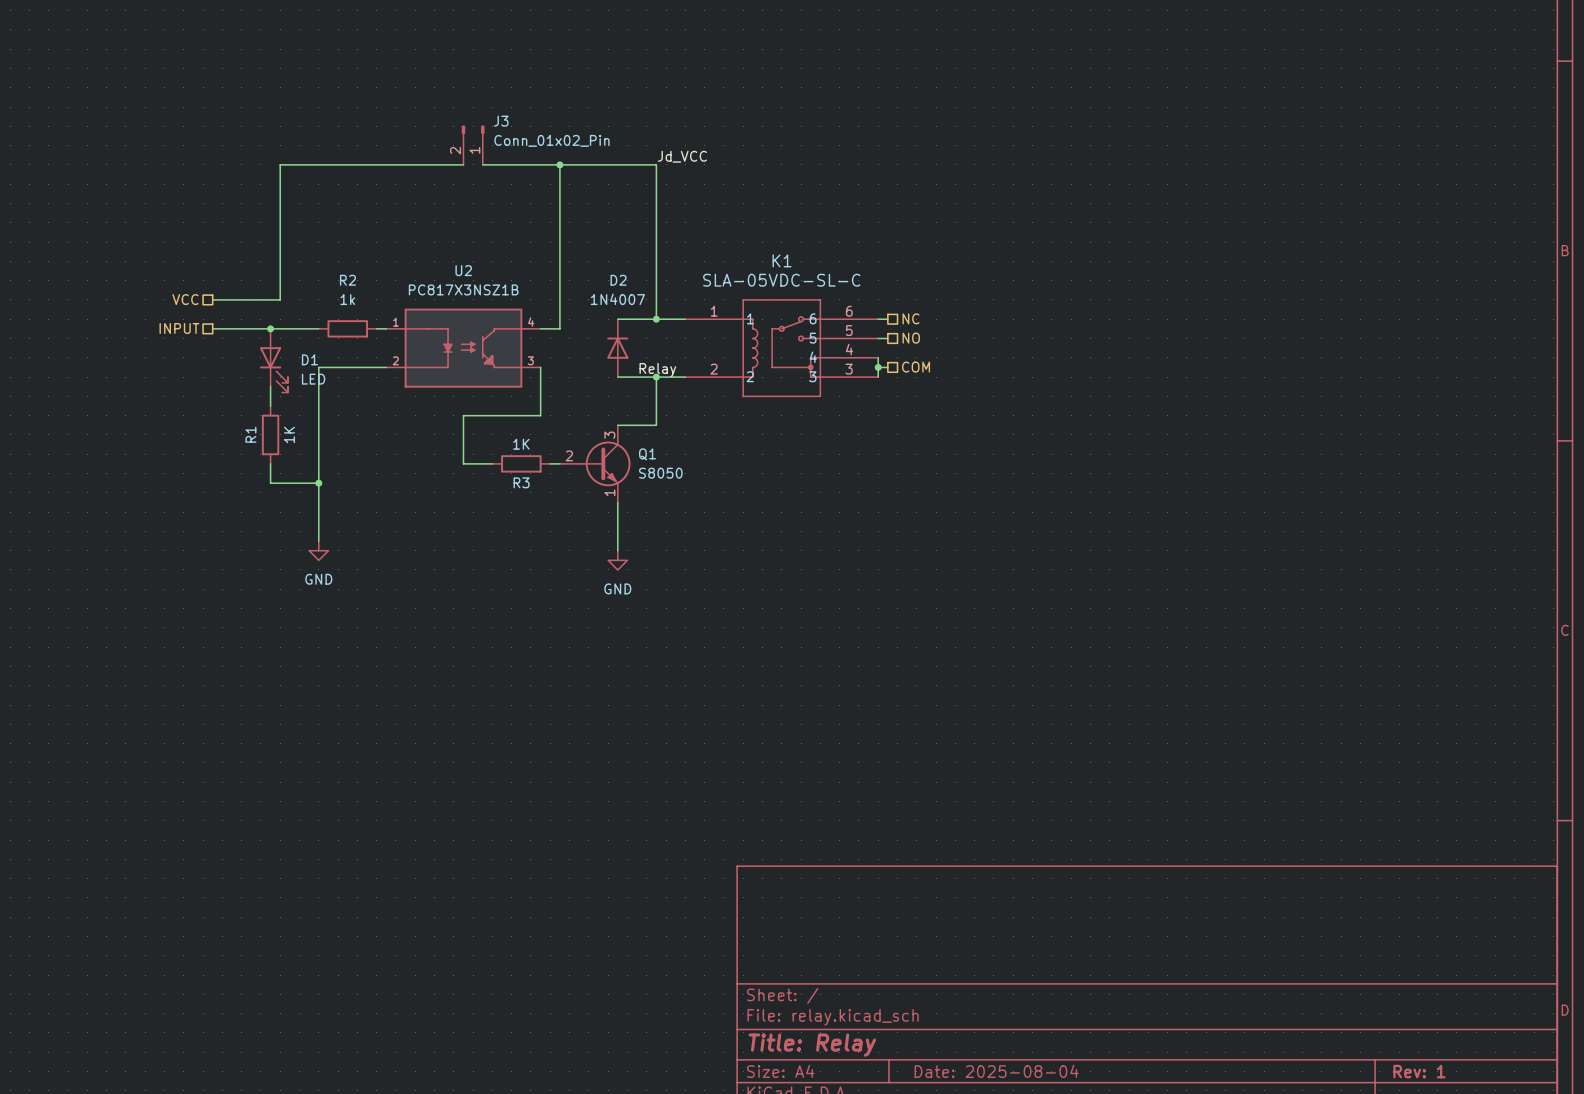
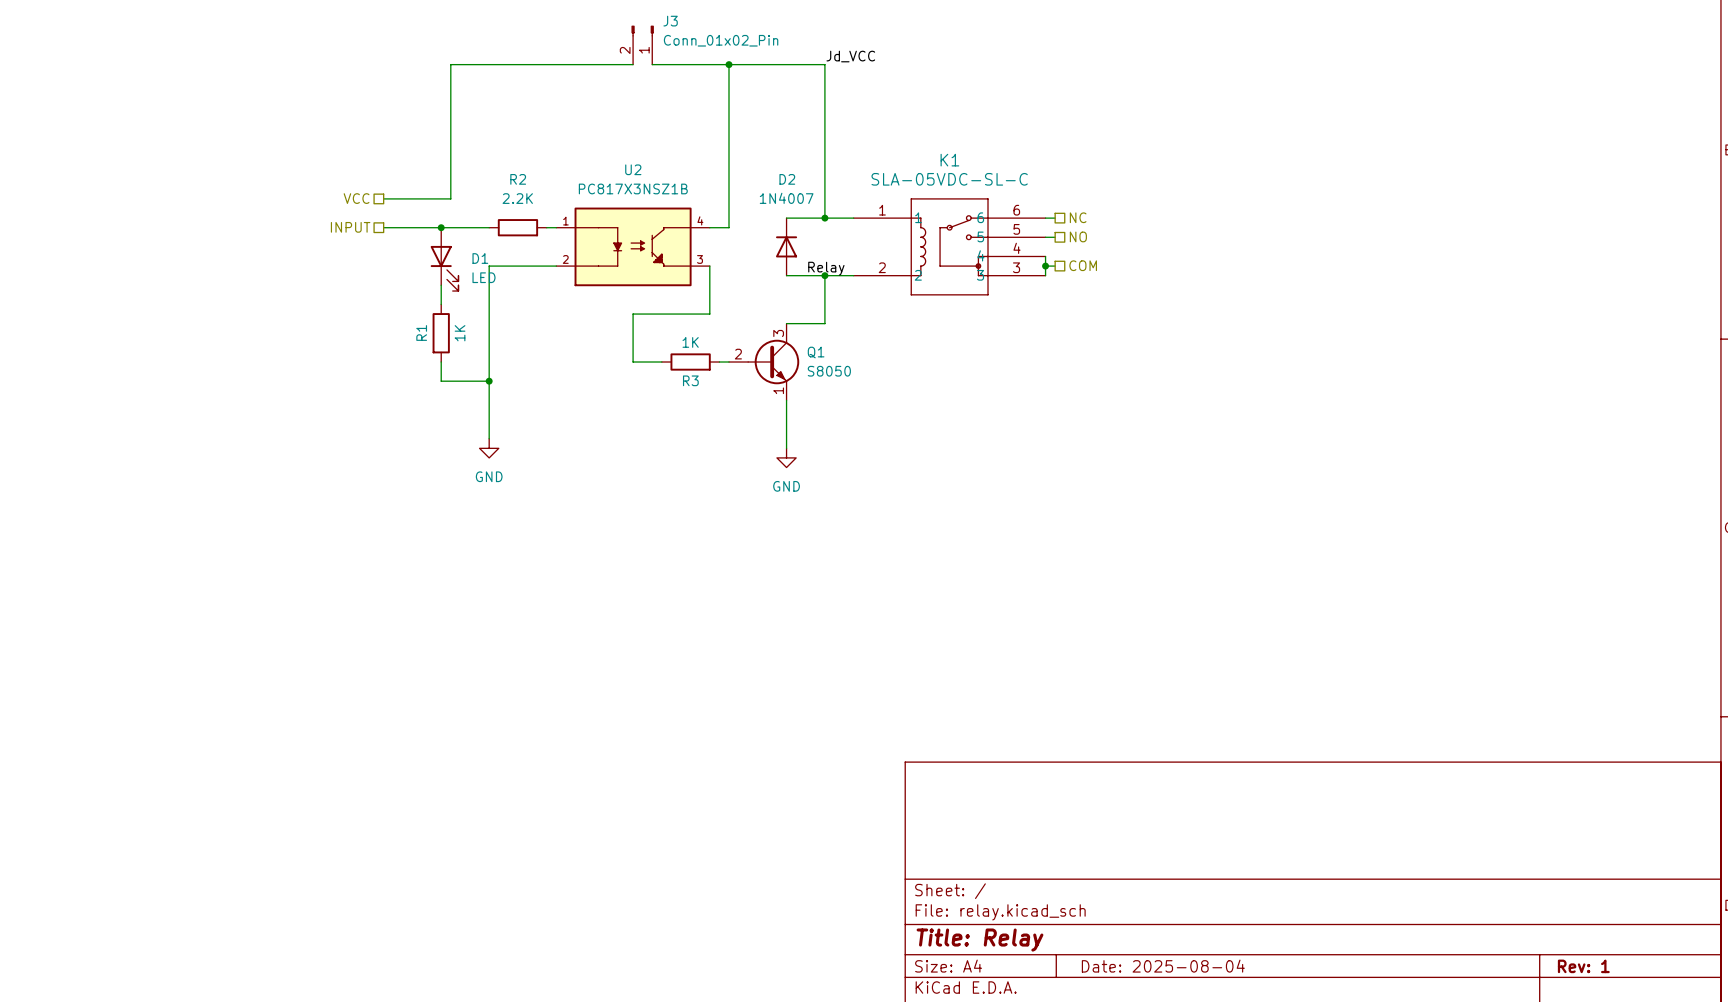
R2 value: 1k (347, 299) -> 2.2K (517, 198)

